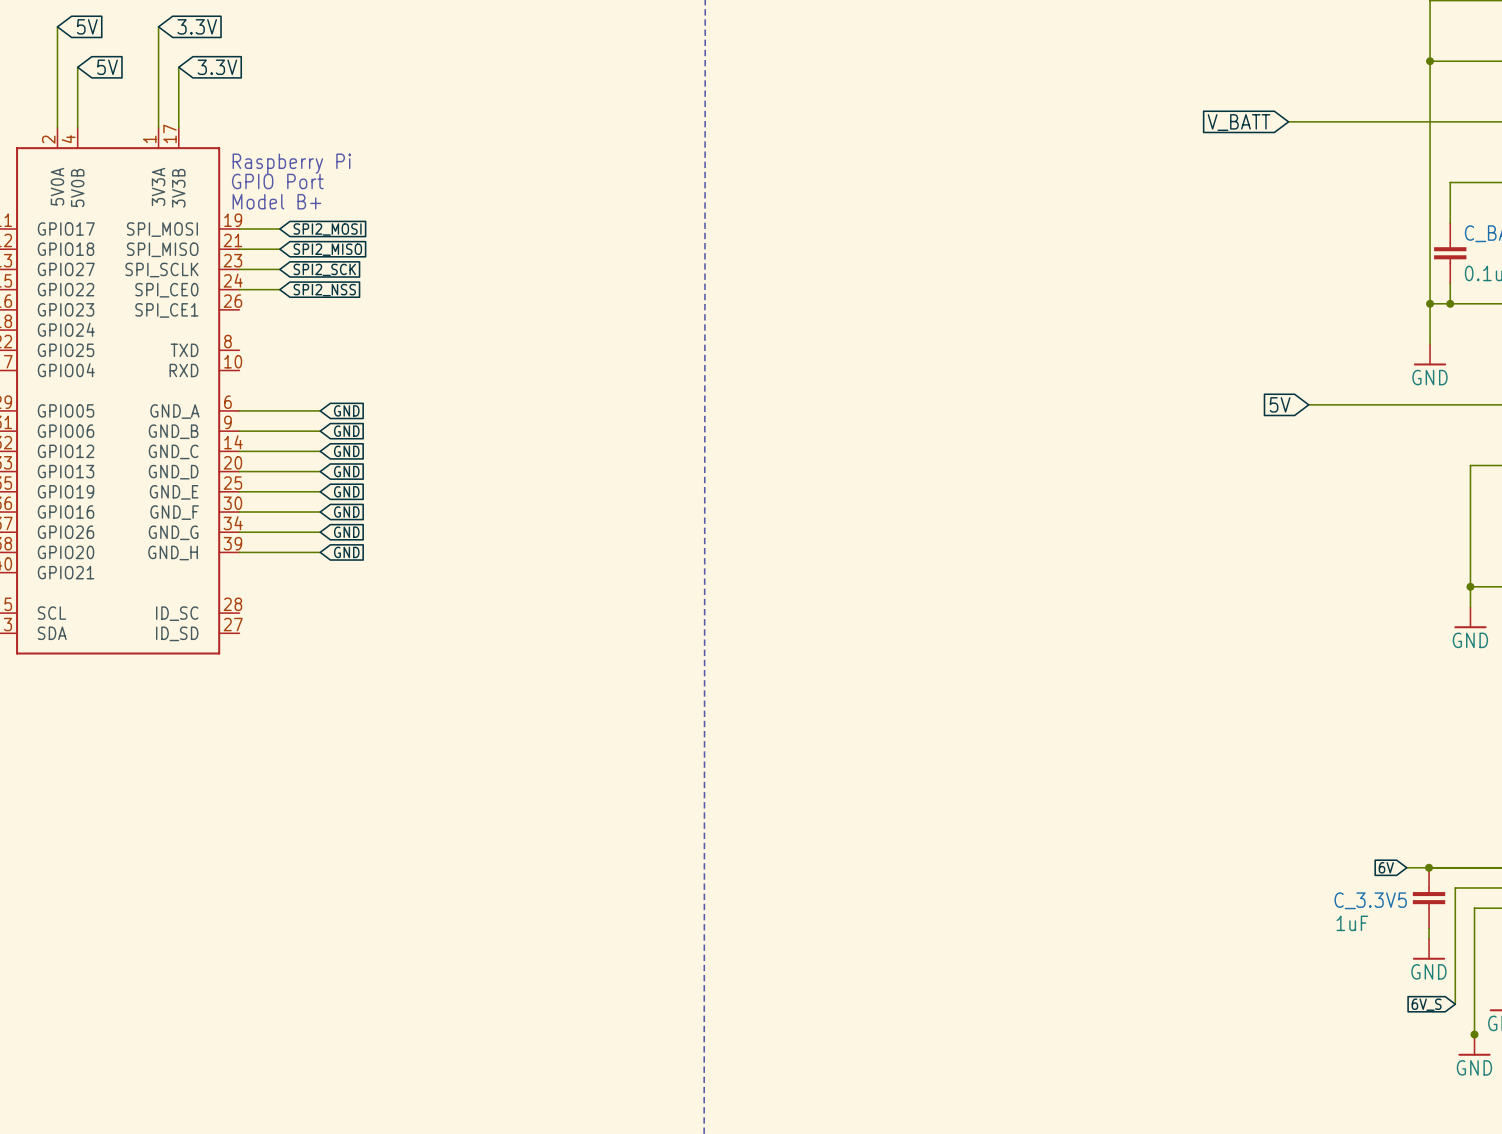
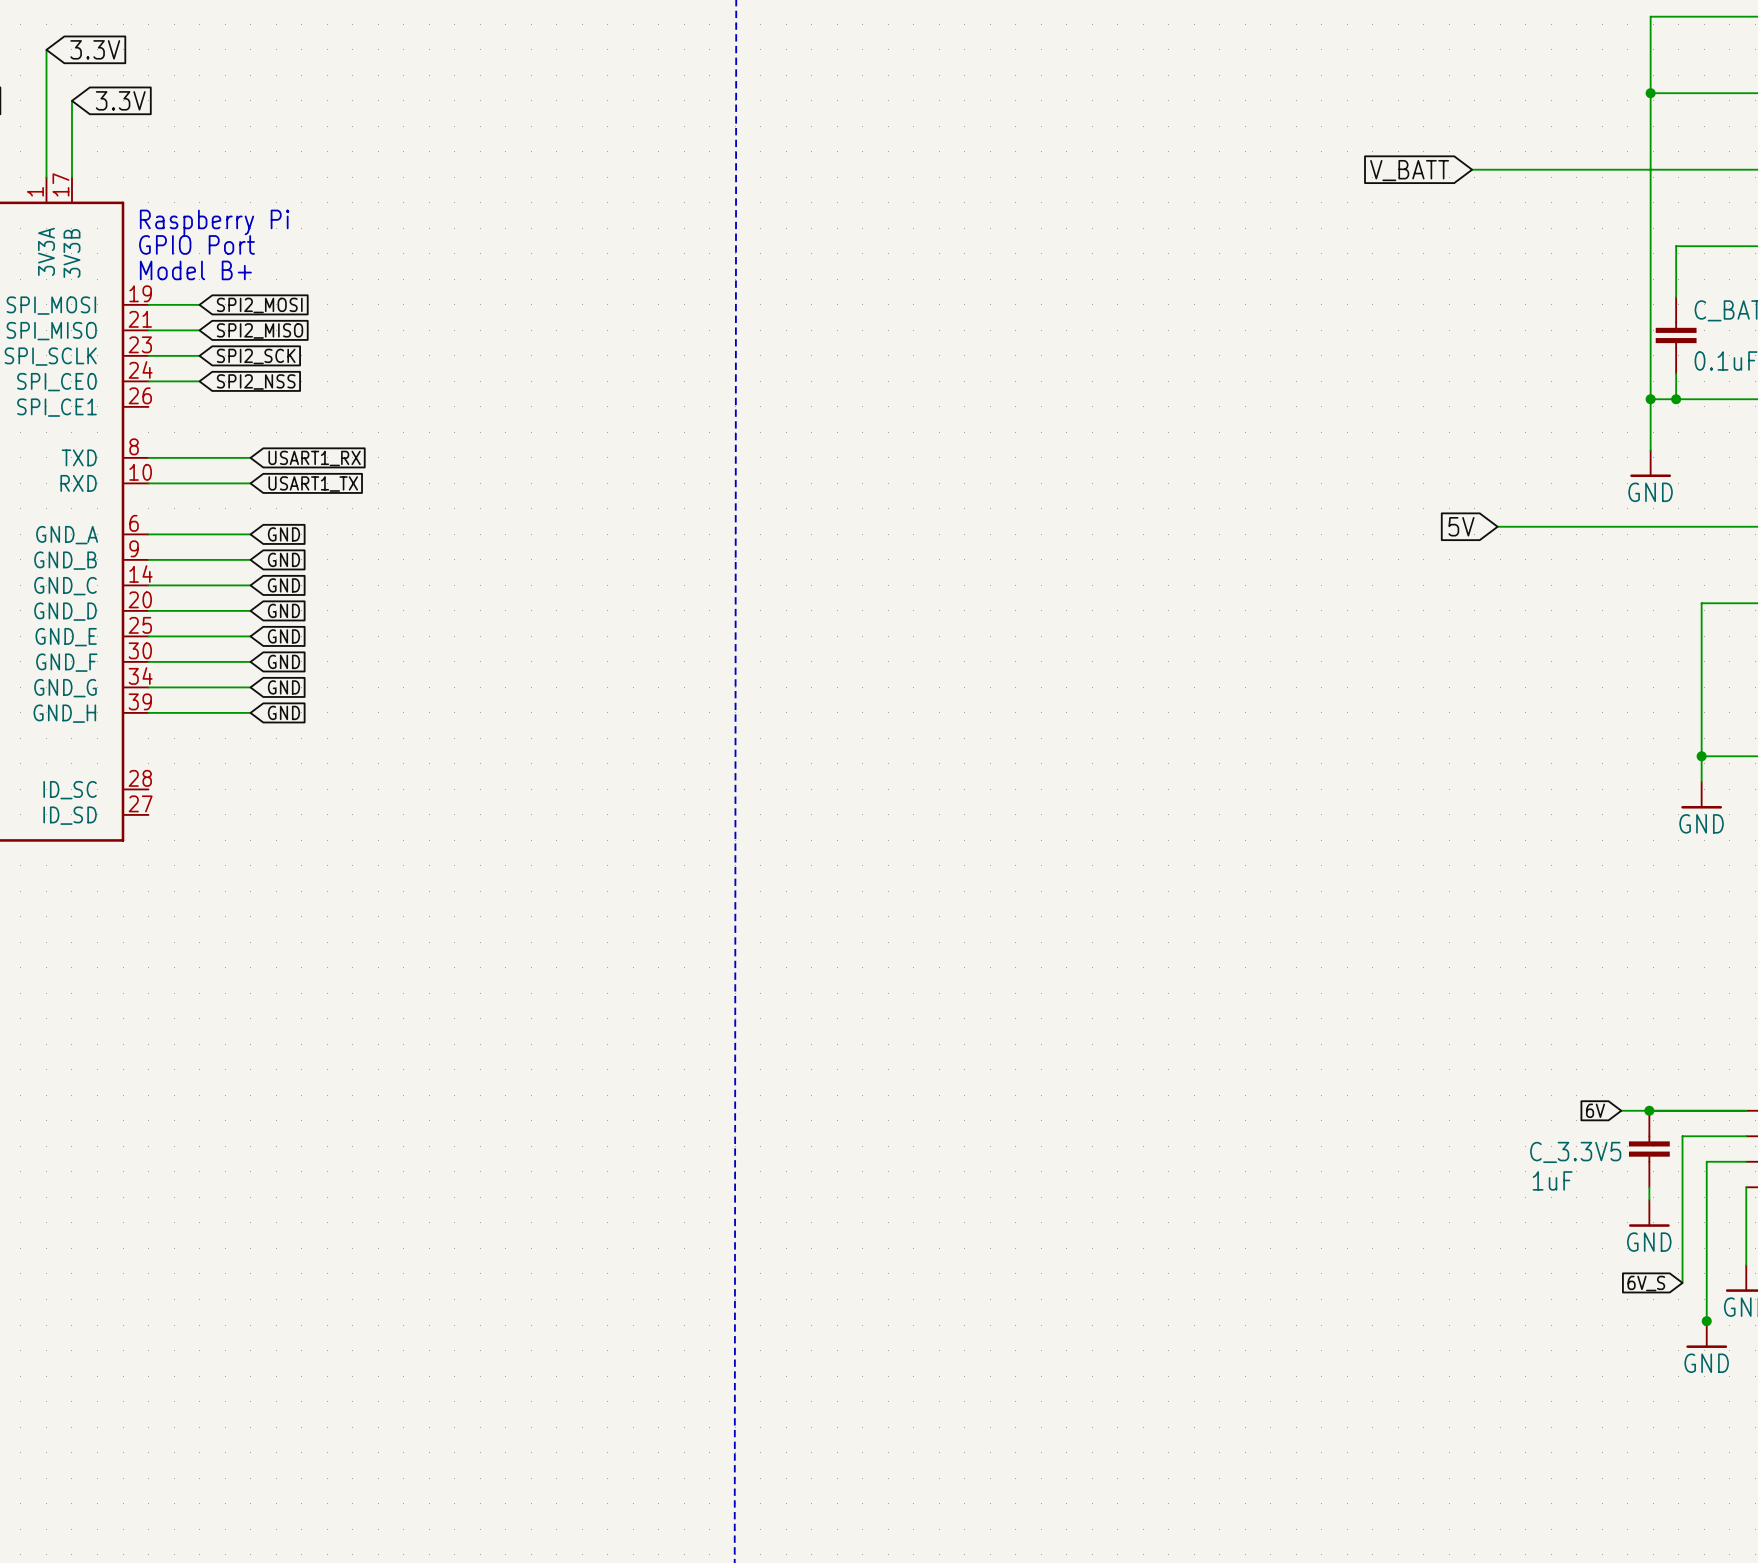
wire: none -> (148, 457) (250, 457)
global label: none -> USART1_RX (314, 458)
wire: none -> (148, 483) (250, 483)
global label: none -> USART1_TX (313, 484)

